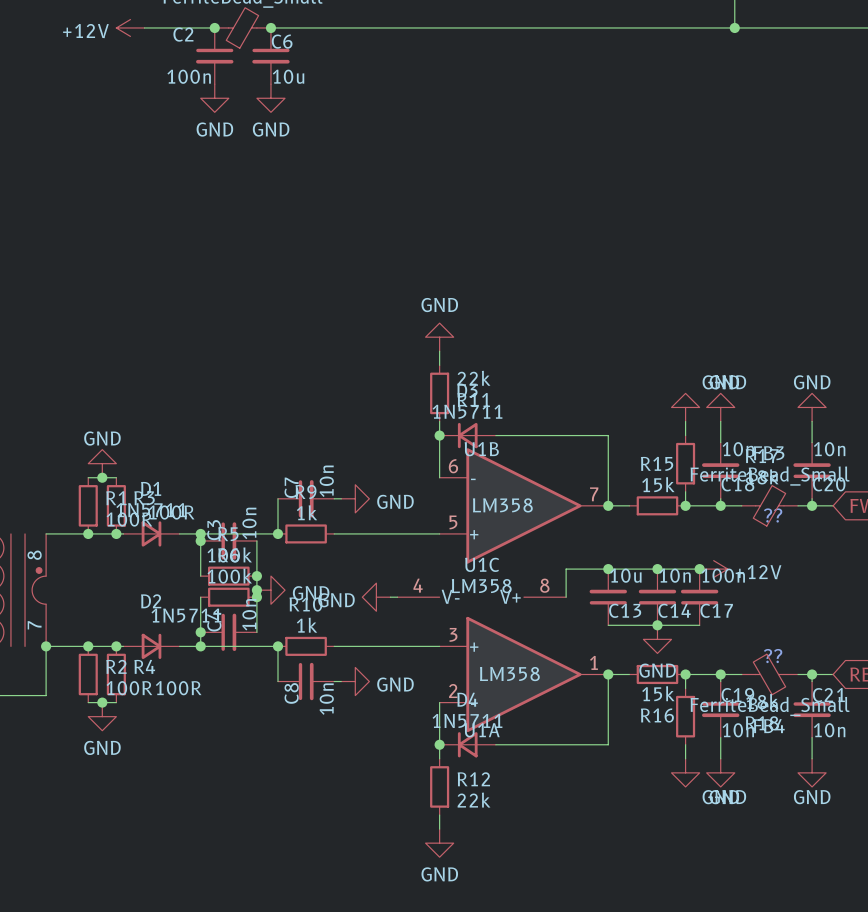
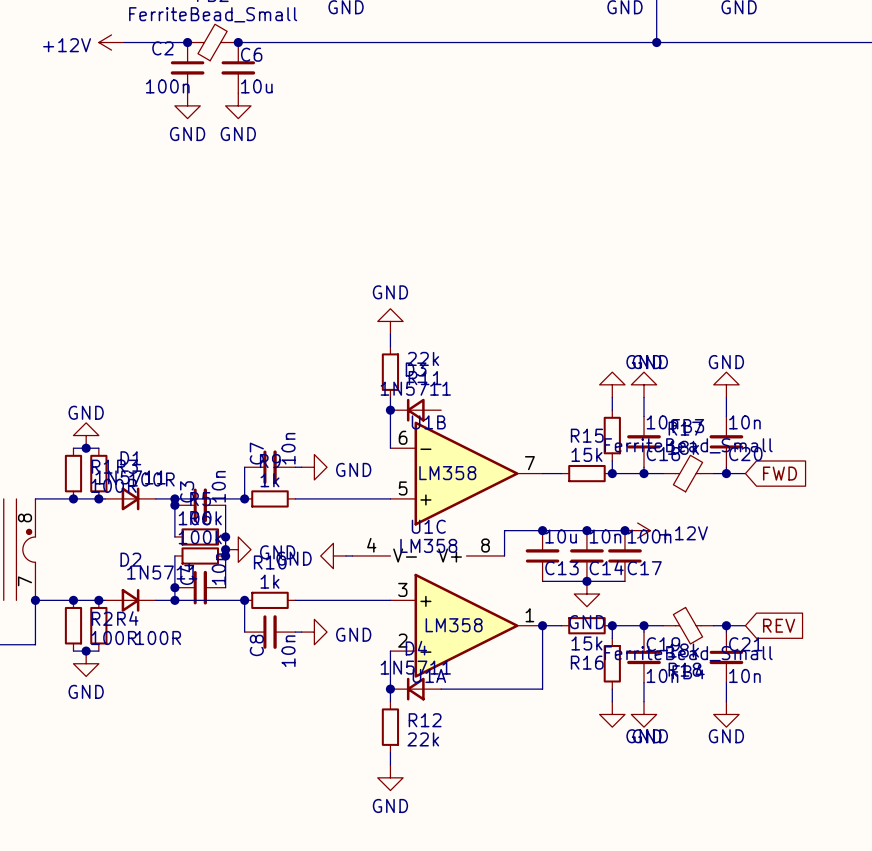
wire: (495, 435) (608, 435) (608, 505) -> none
junction: (608, 505) -> none
text: ?? (773, 515) -> none
text: ?? (773, 656) -> none

